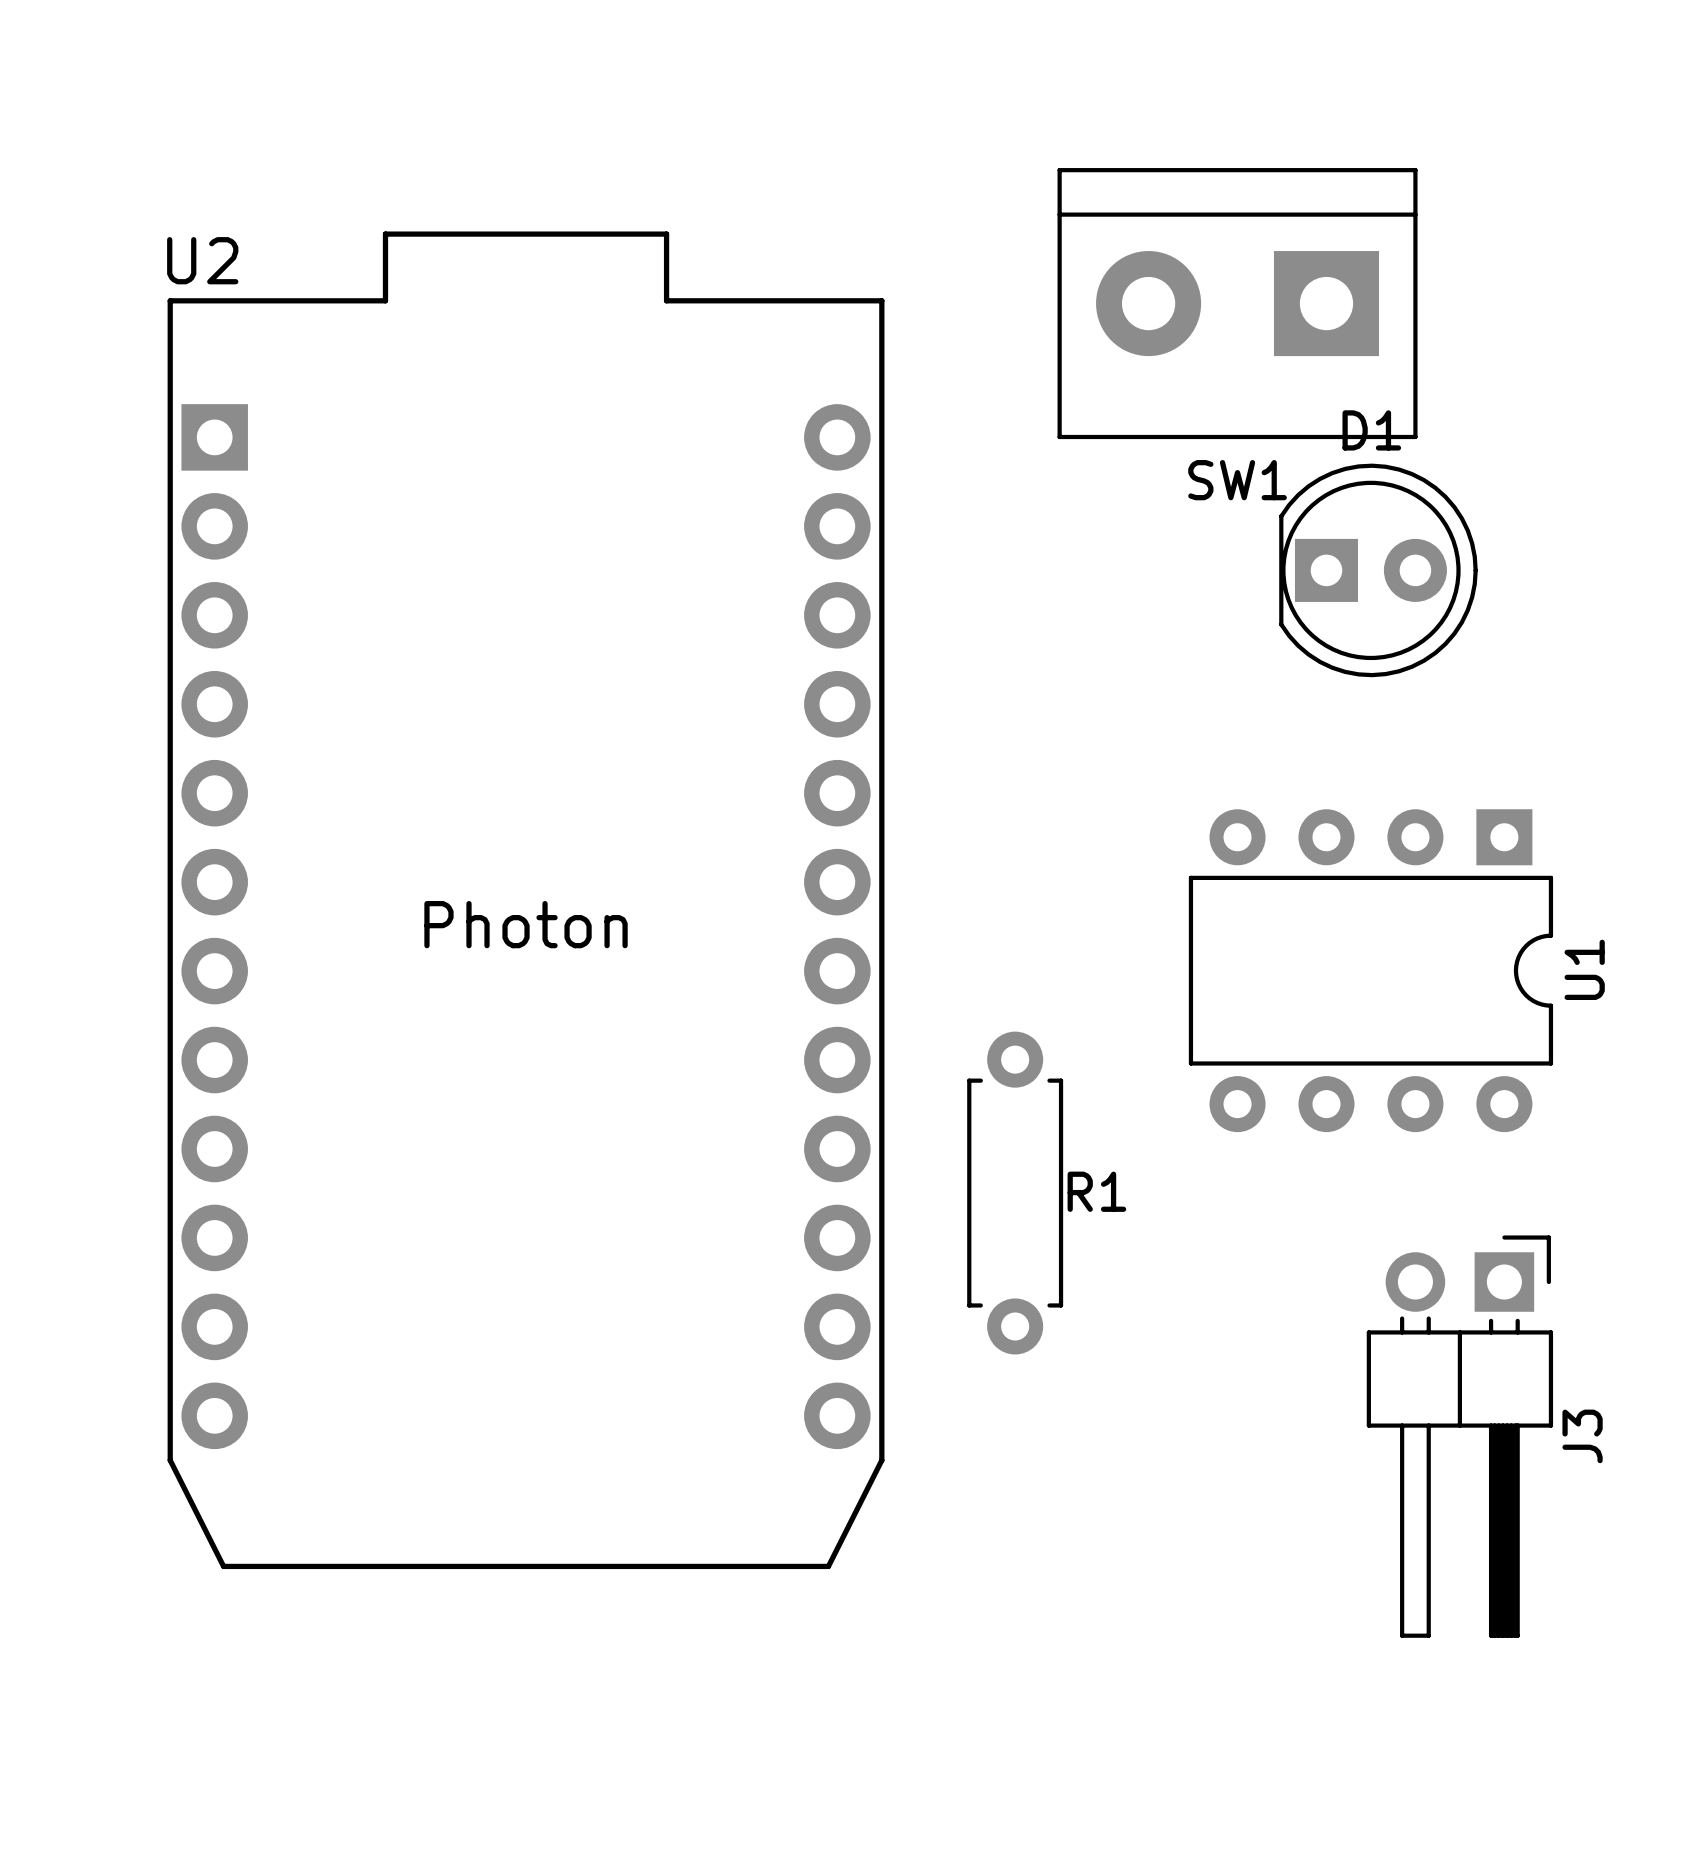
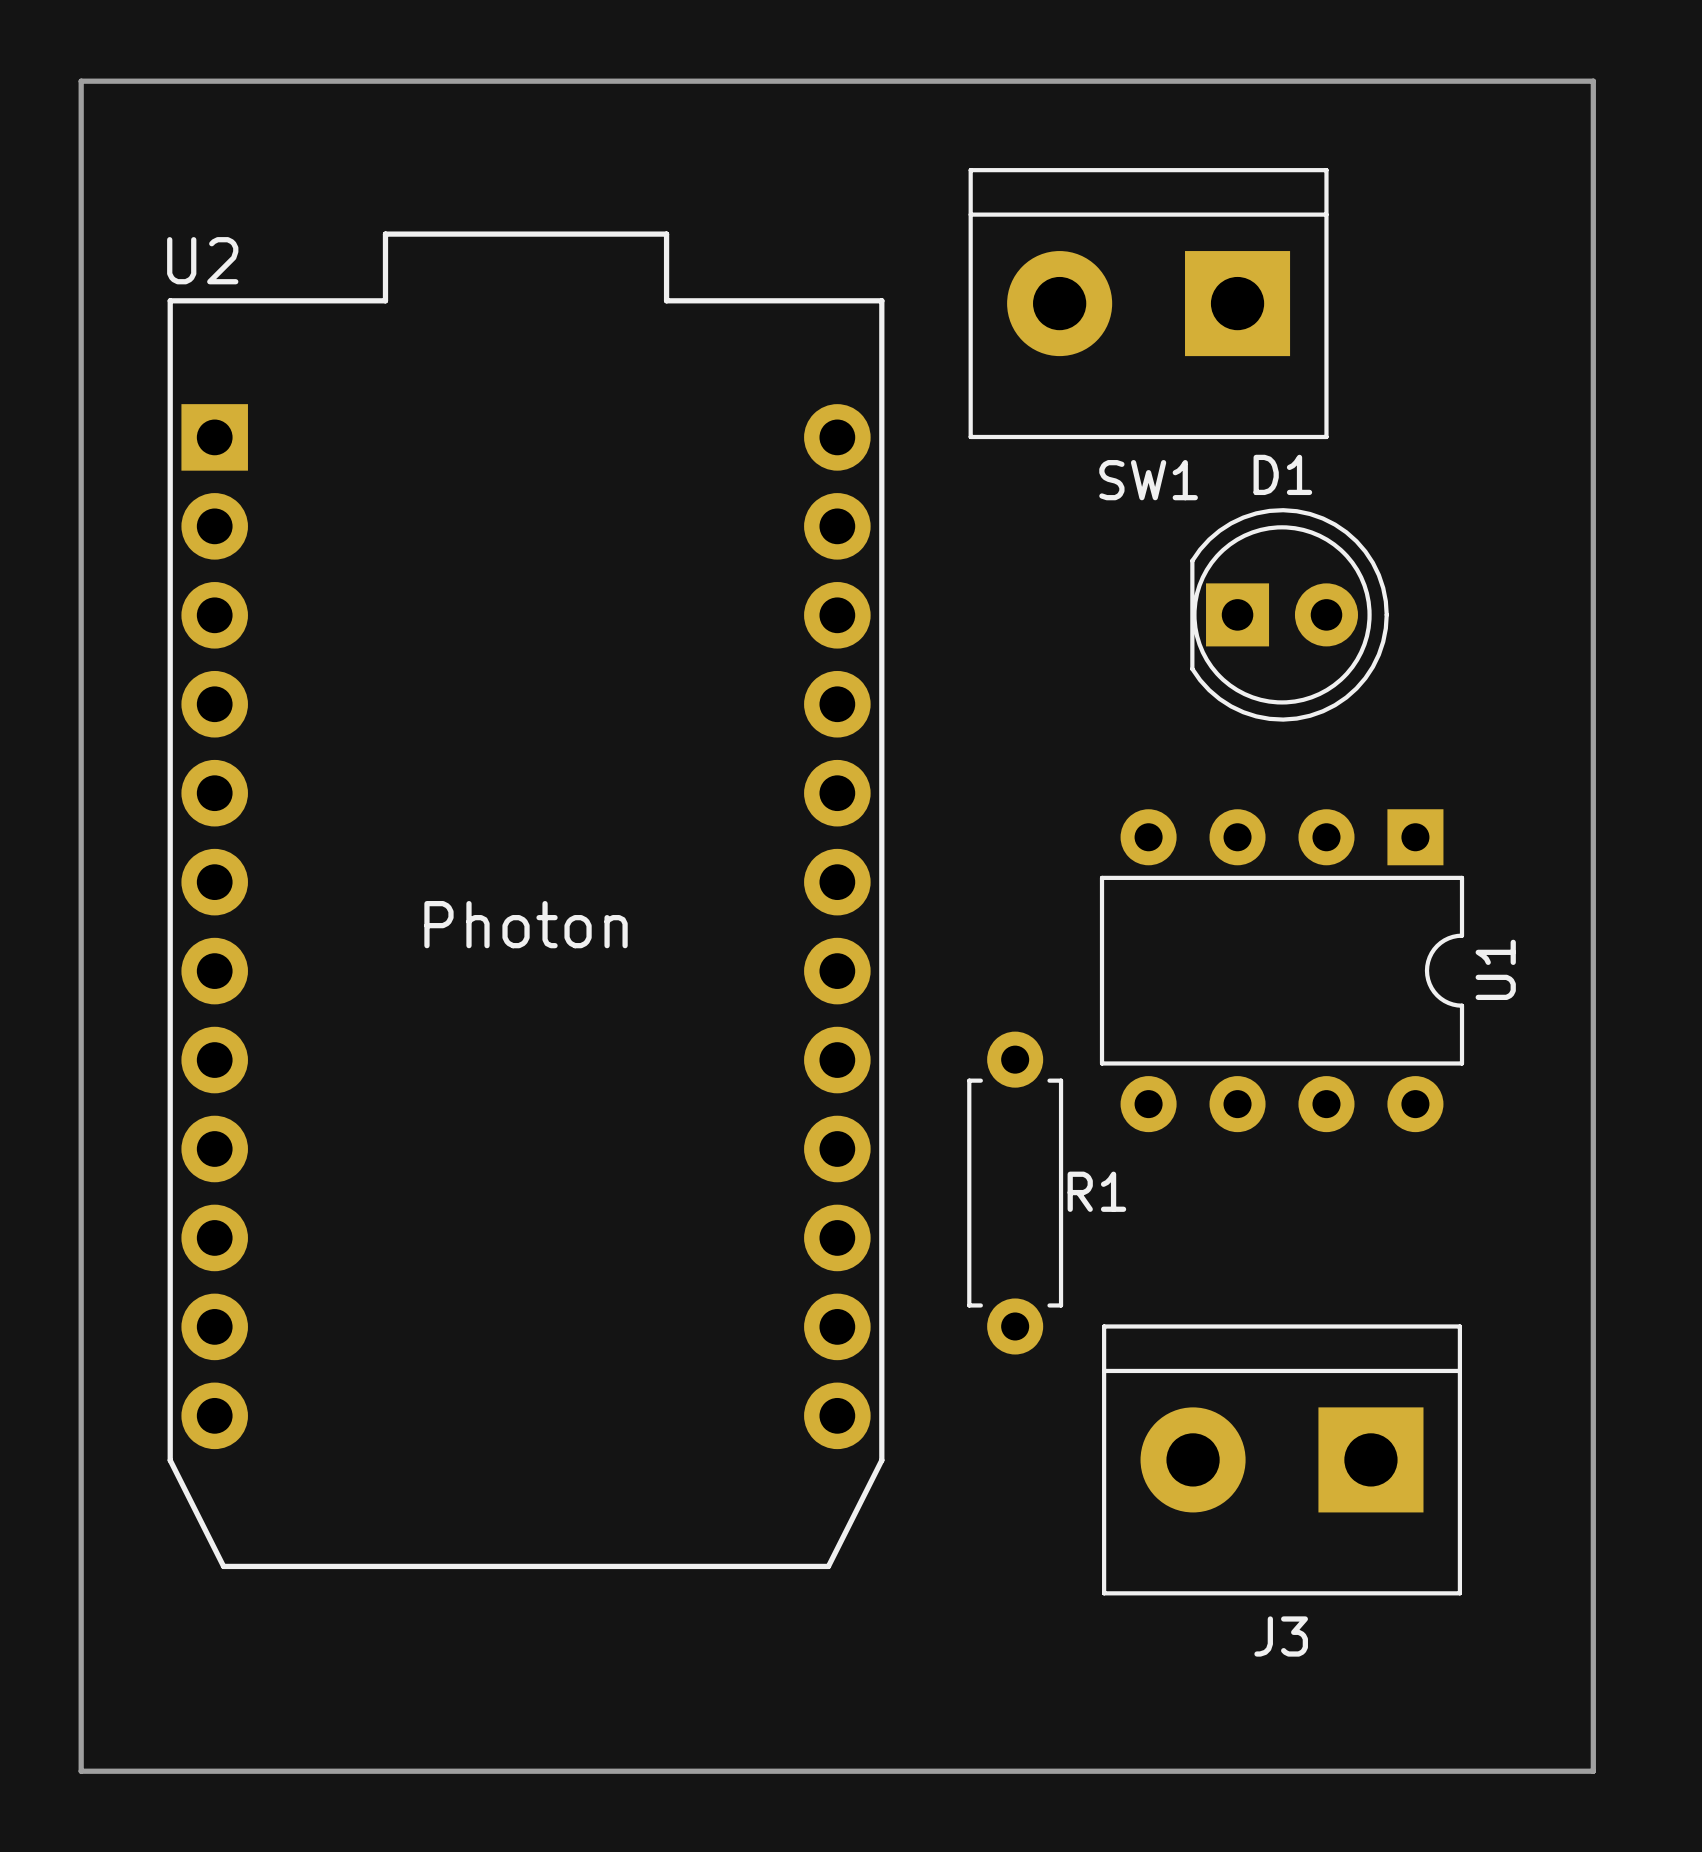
board edge: none -> (81, 81) (81, 1771) (1593, 1771) (1593, 81) (81, 81)
SW1 position: (1237, 303) -> (1148, 303)
D1 position: (1378, 570) -> (1289, 614)
U1 position: (1370, 970) -> (1282, 970)
J3 footprint: [1366, 1235, 1554, 1638] -> [1102, 1324, 1463, 1596]
J3 name position: J3 (1582, 1436) -> J3 (1281, 1636)

